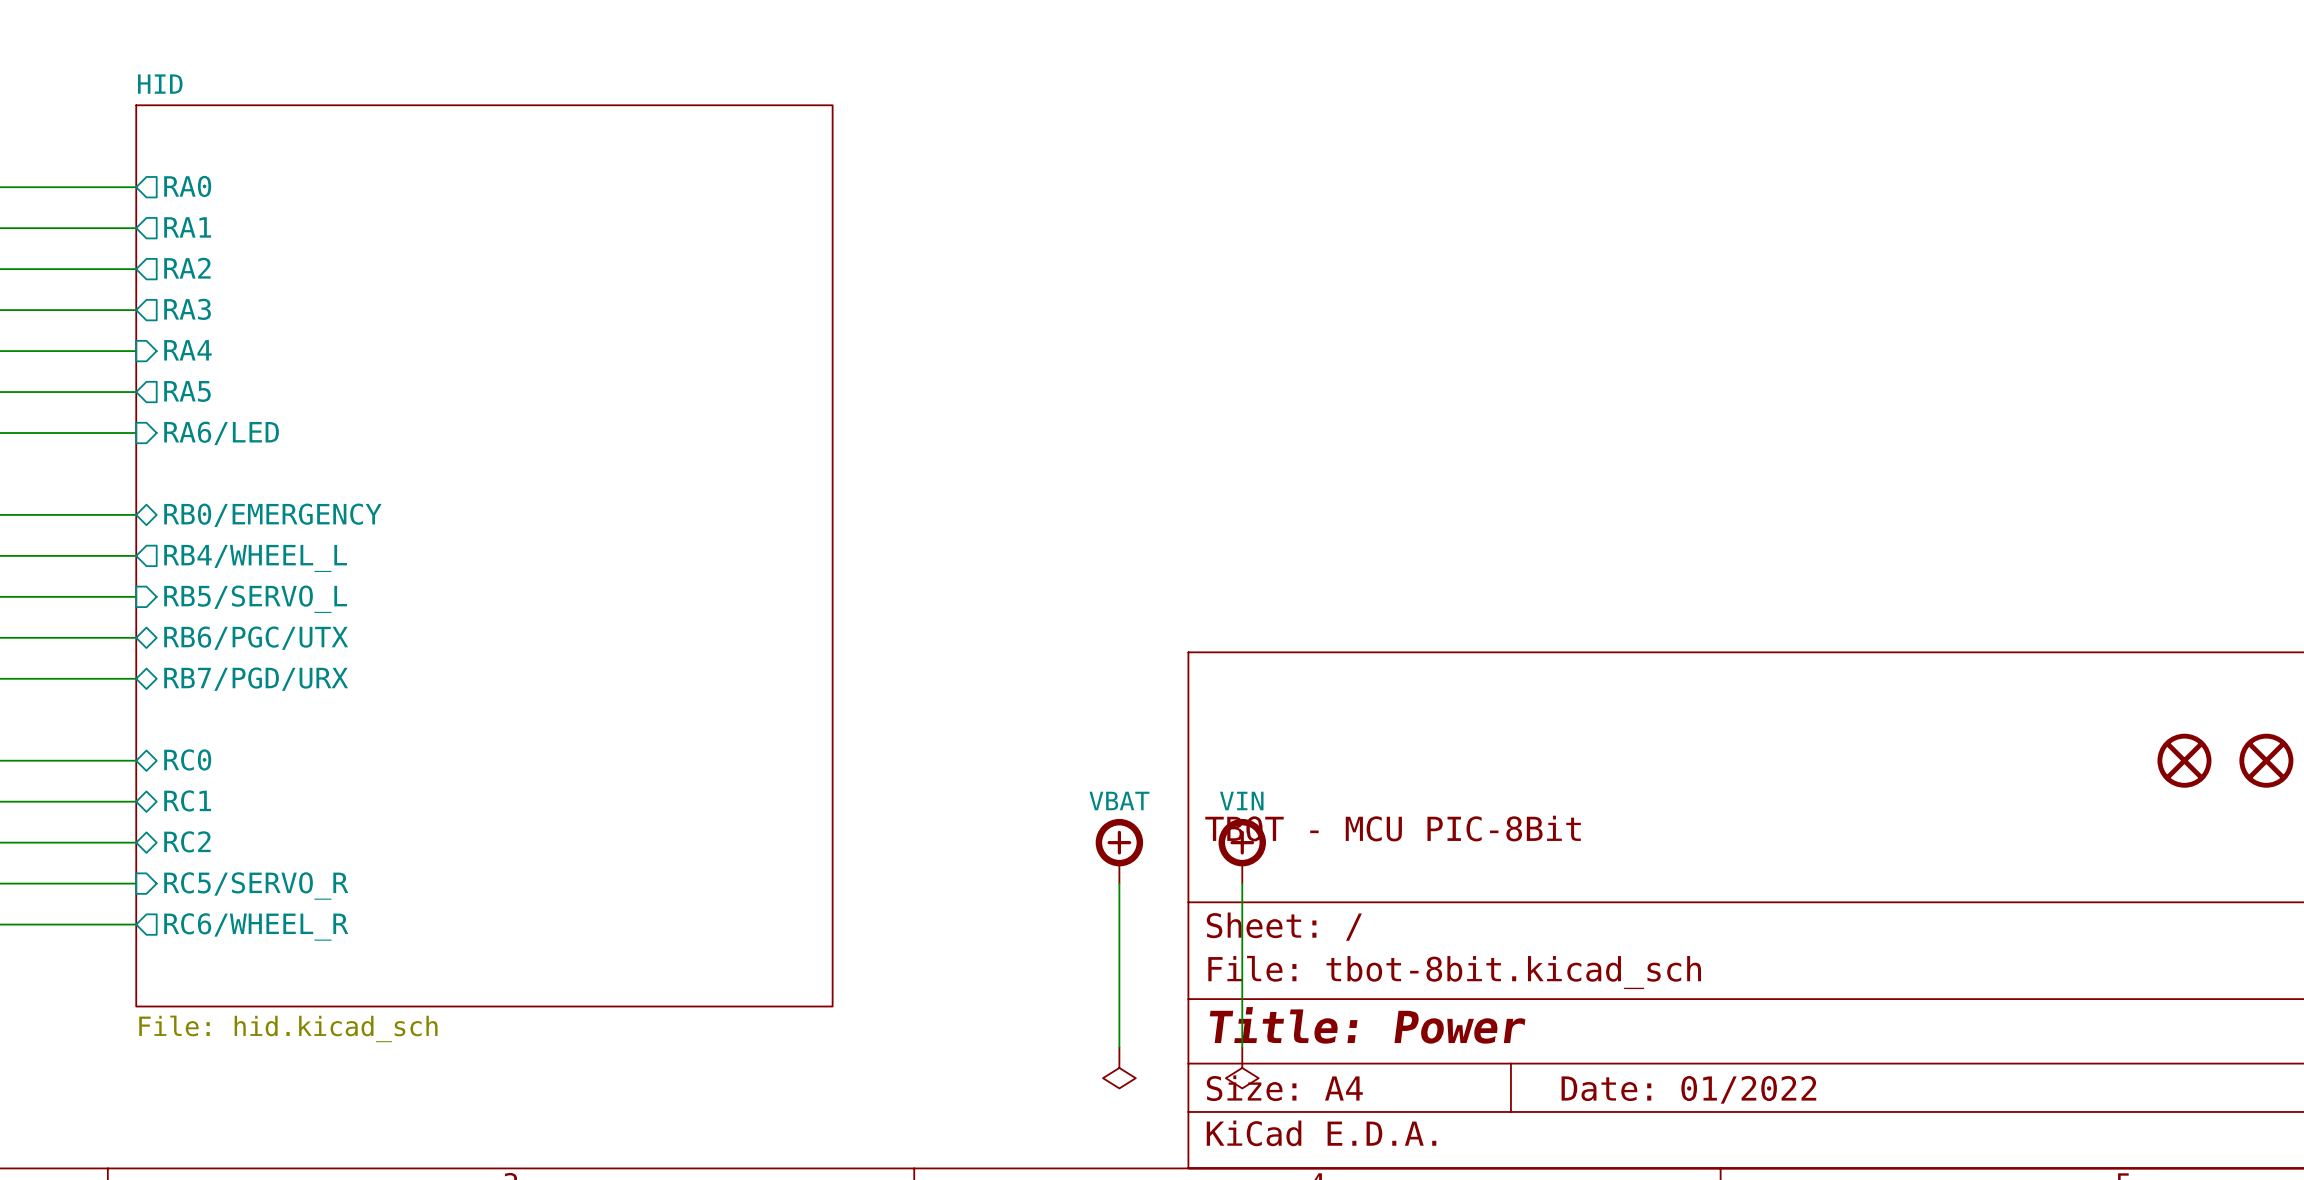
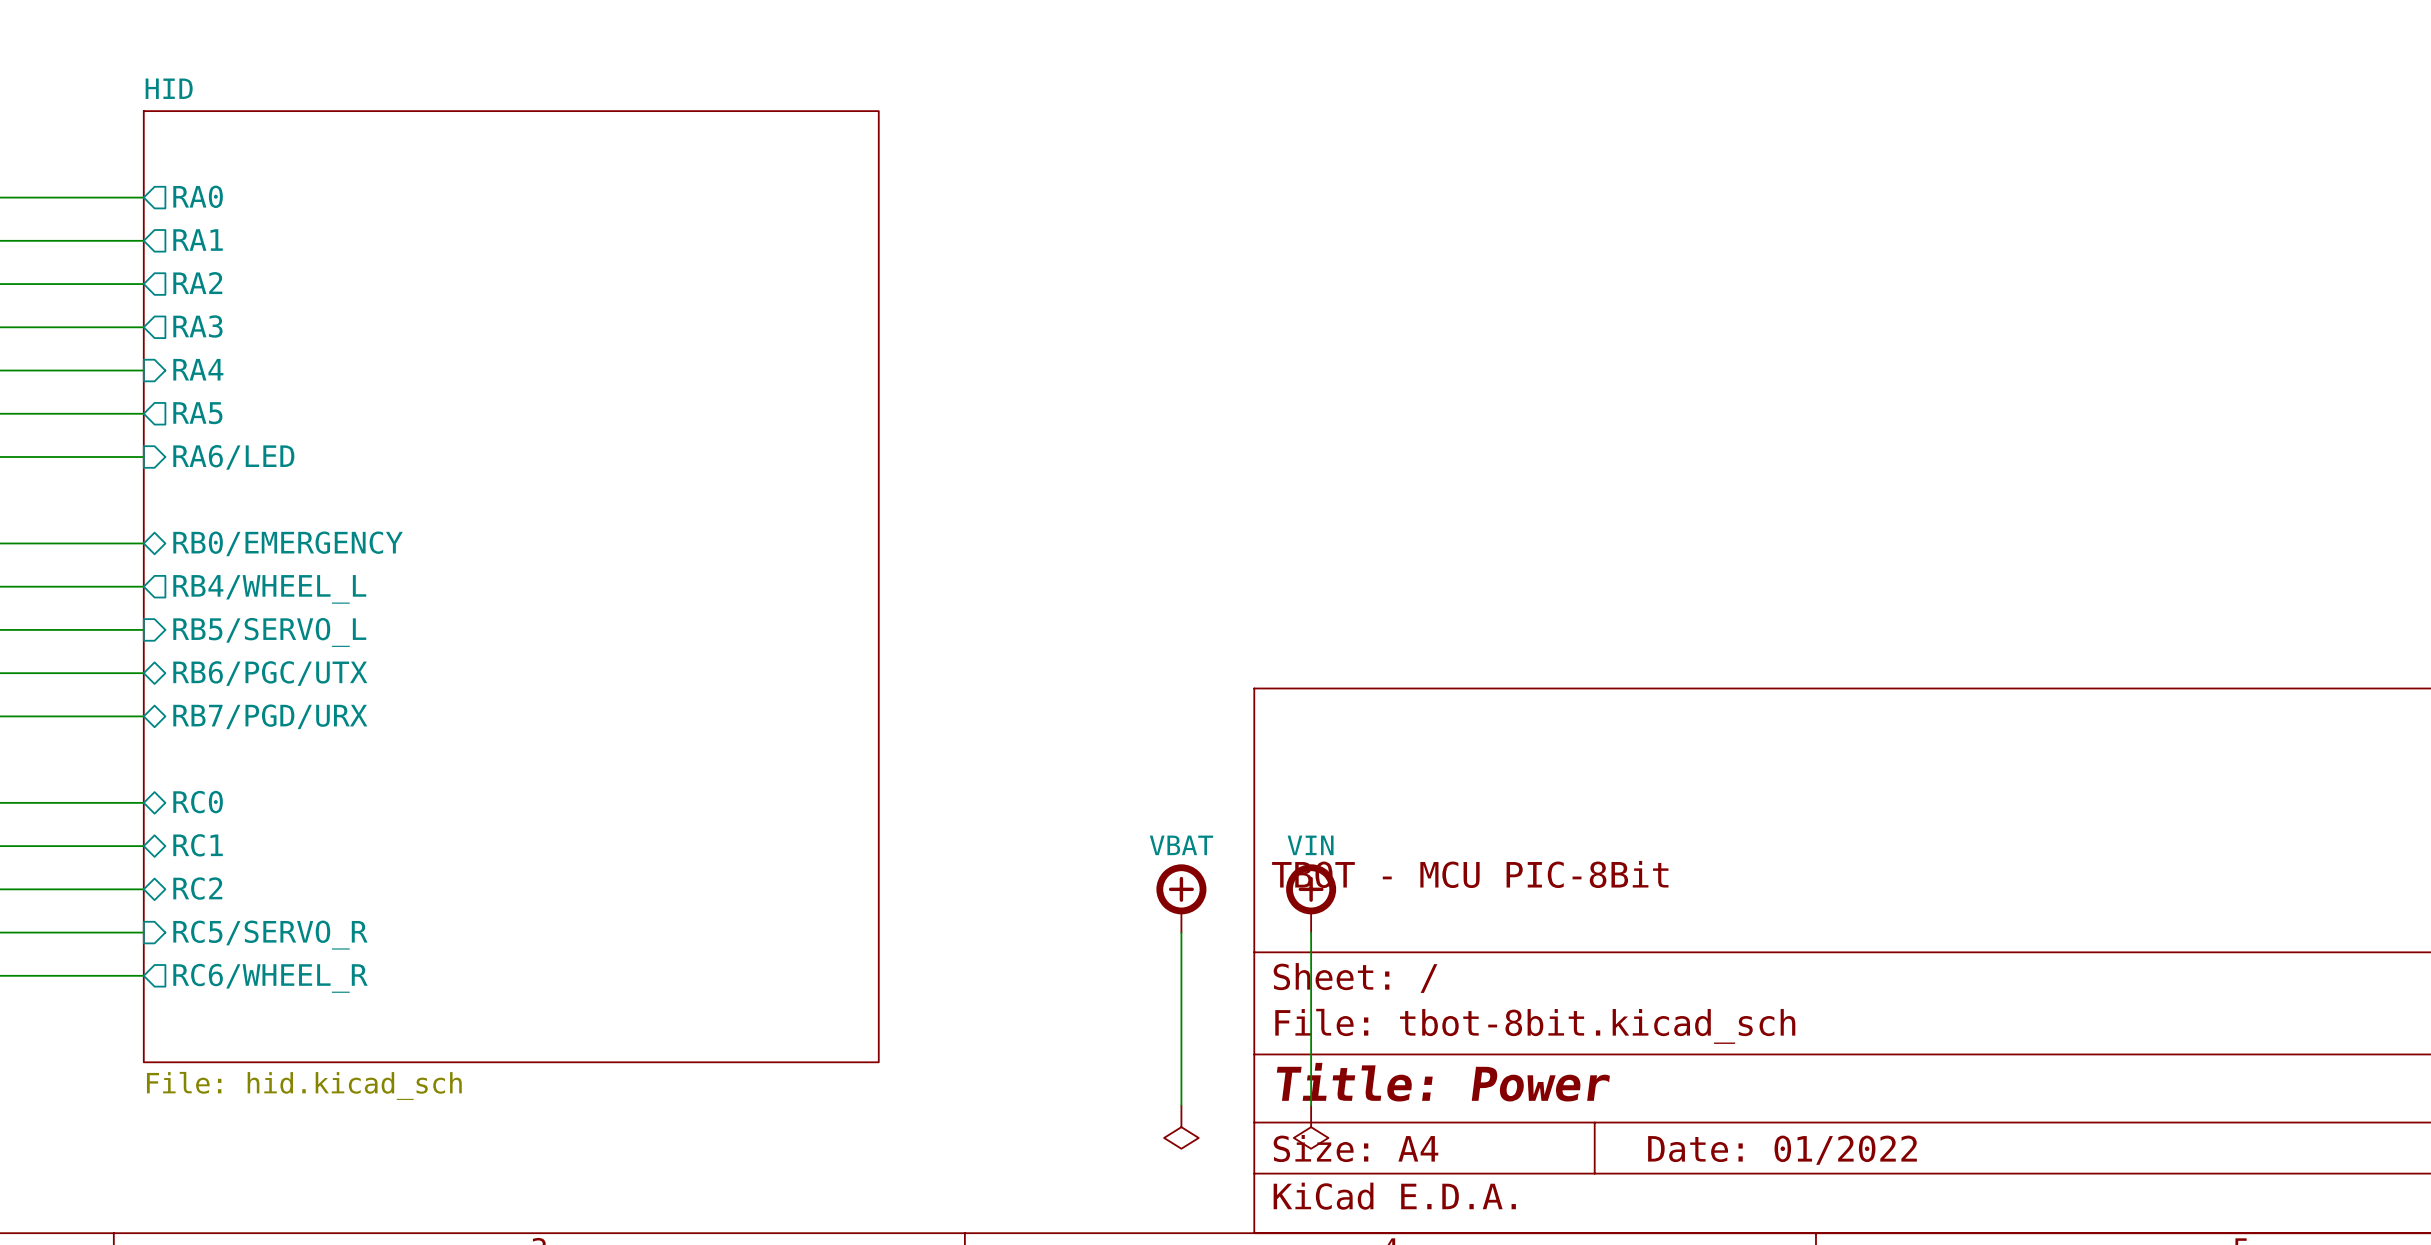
part: (2184, 760) -> none
part: (2266, 760) -> none

